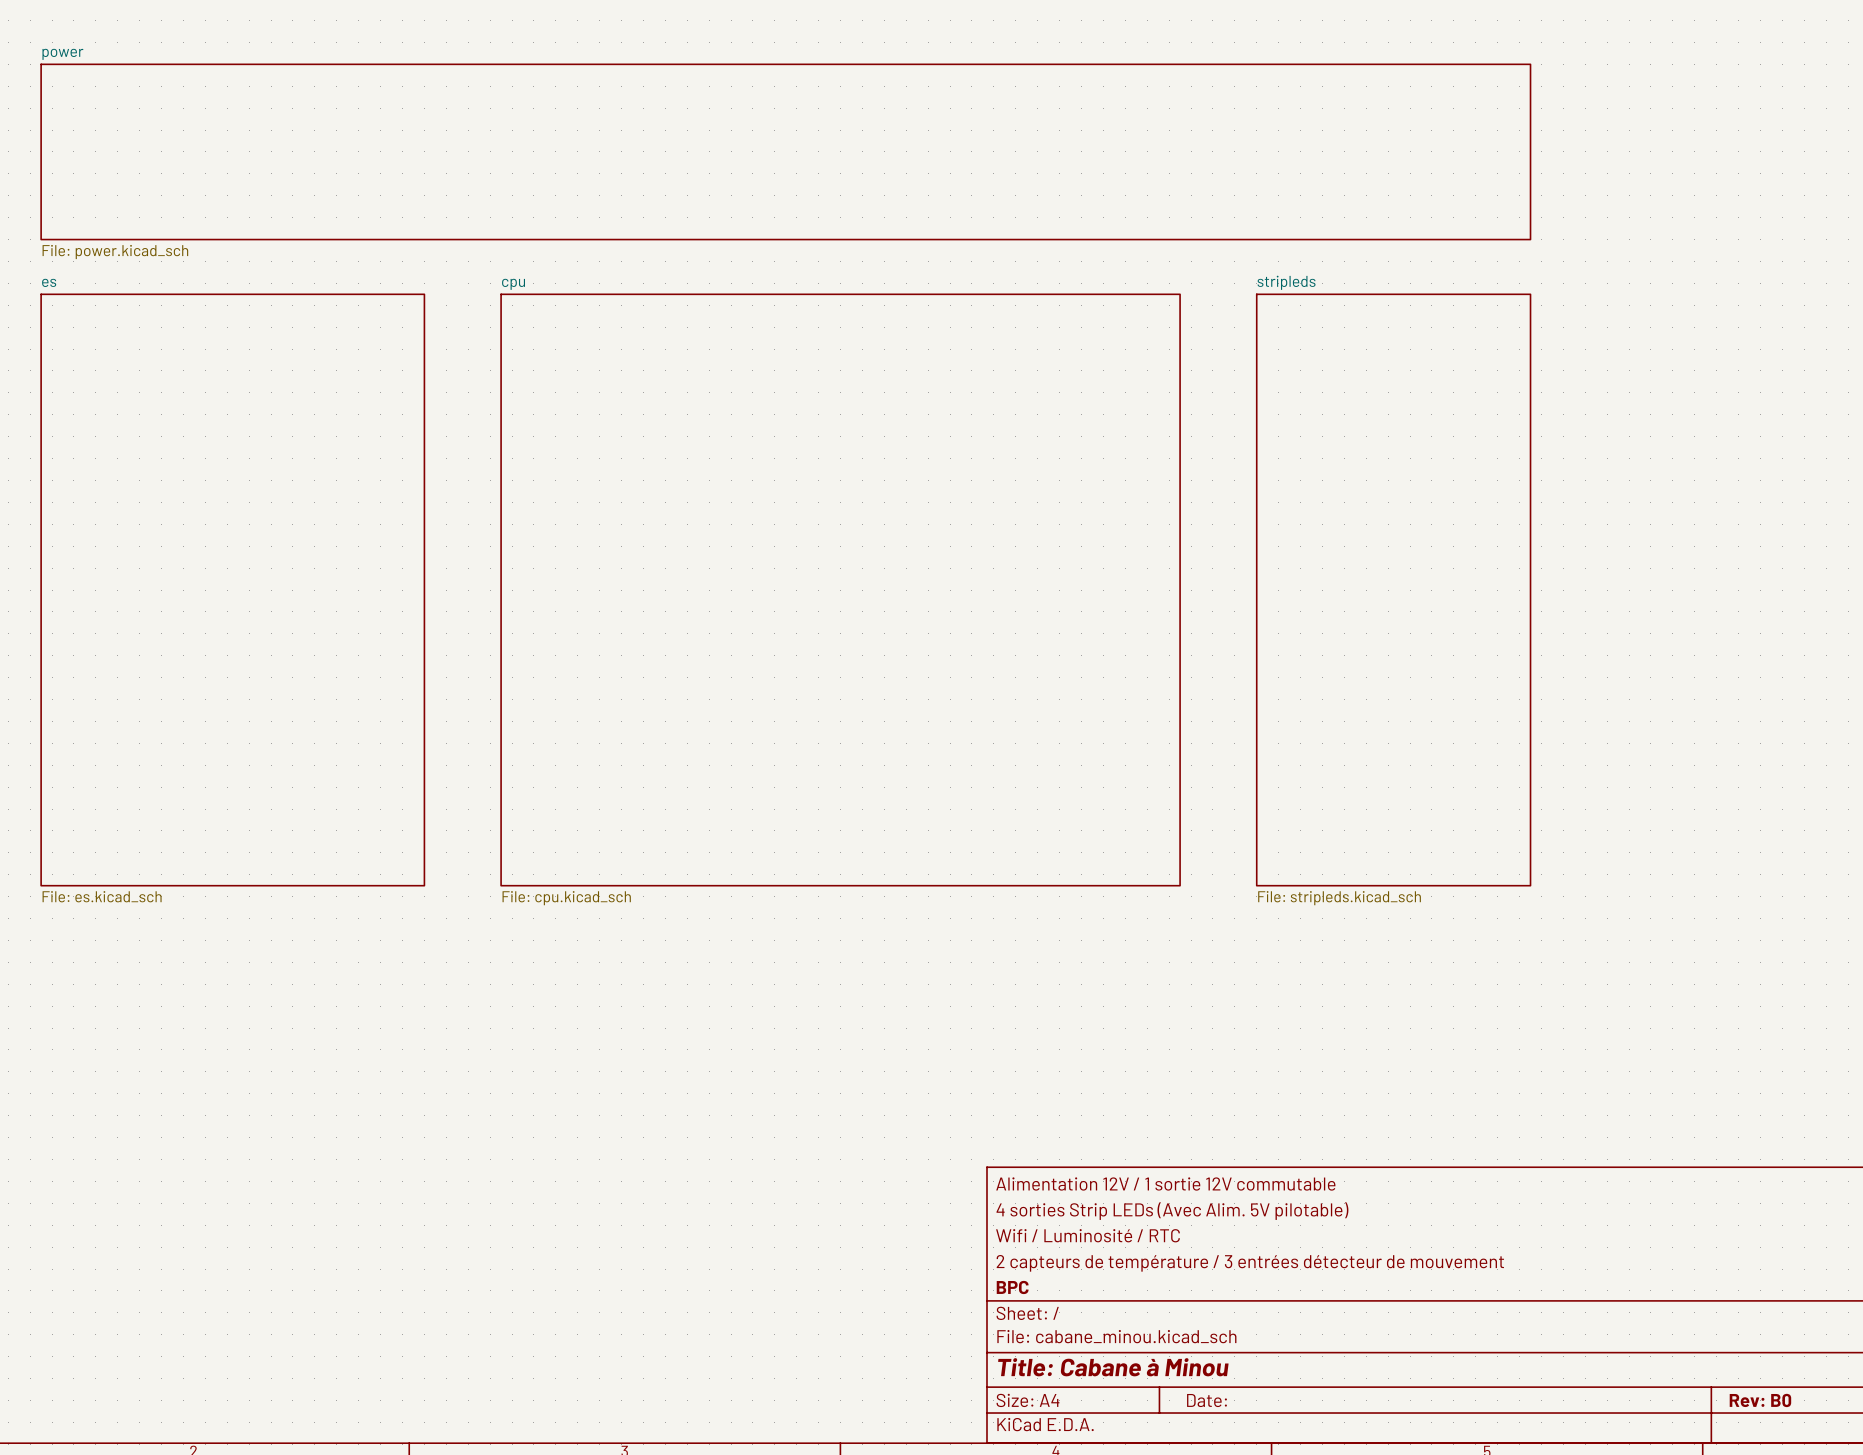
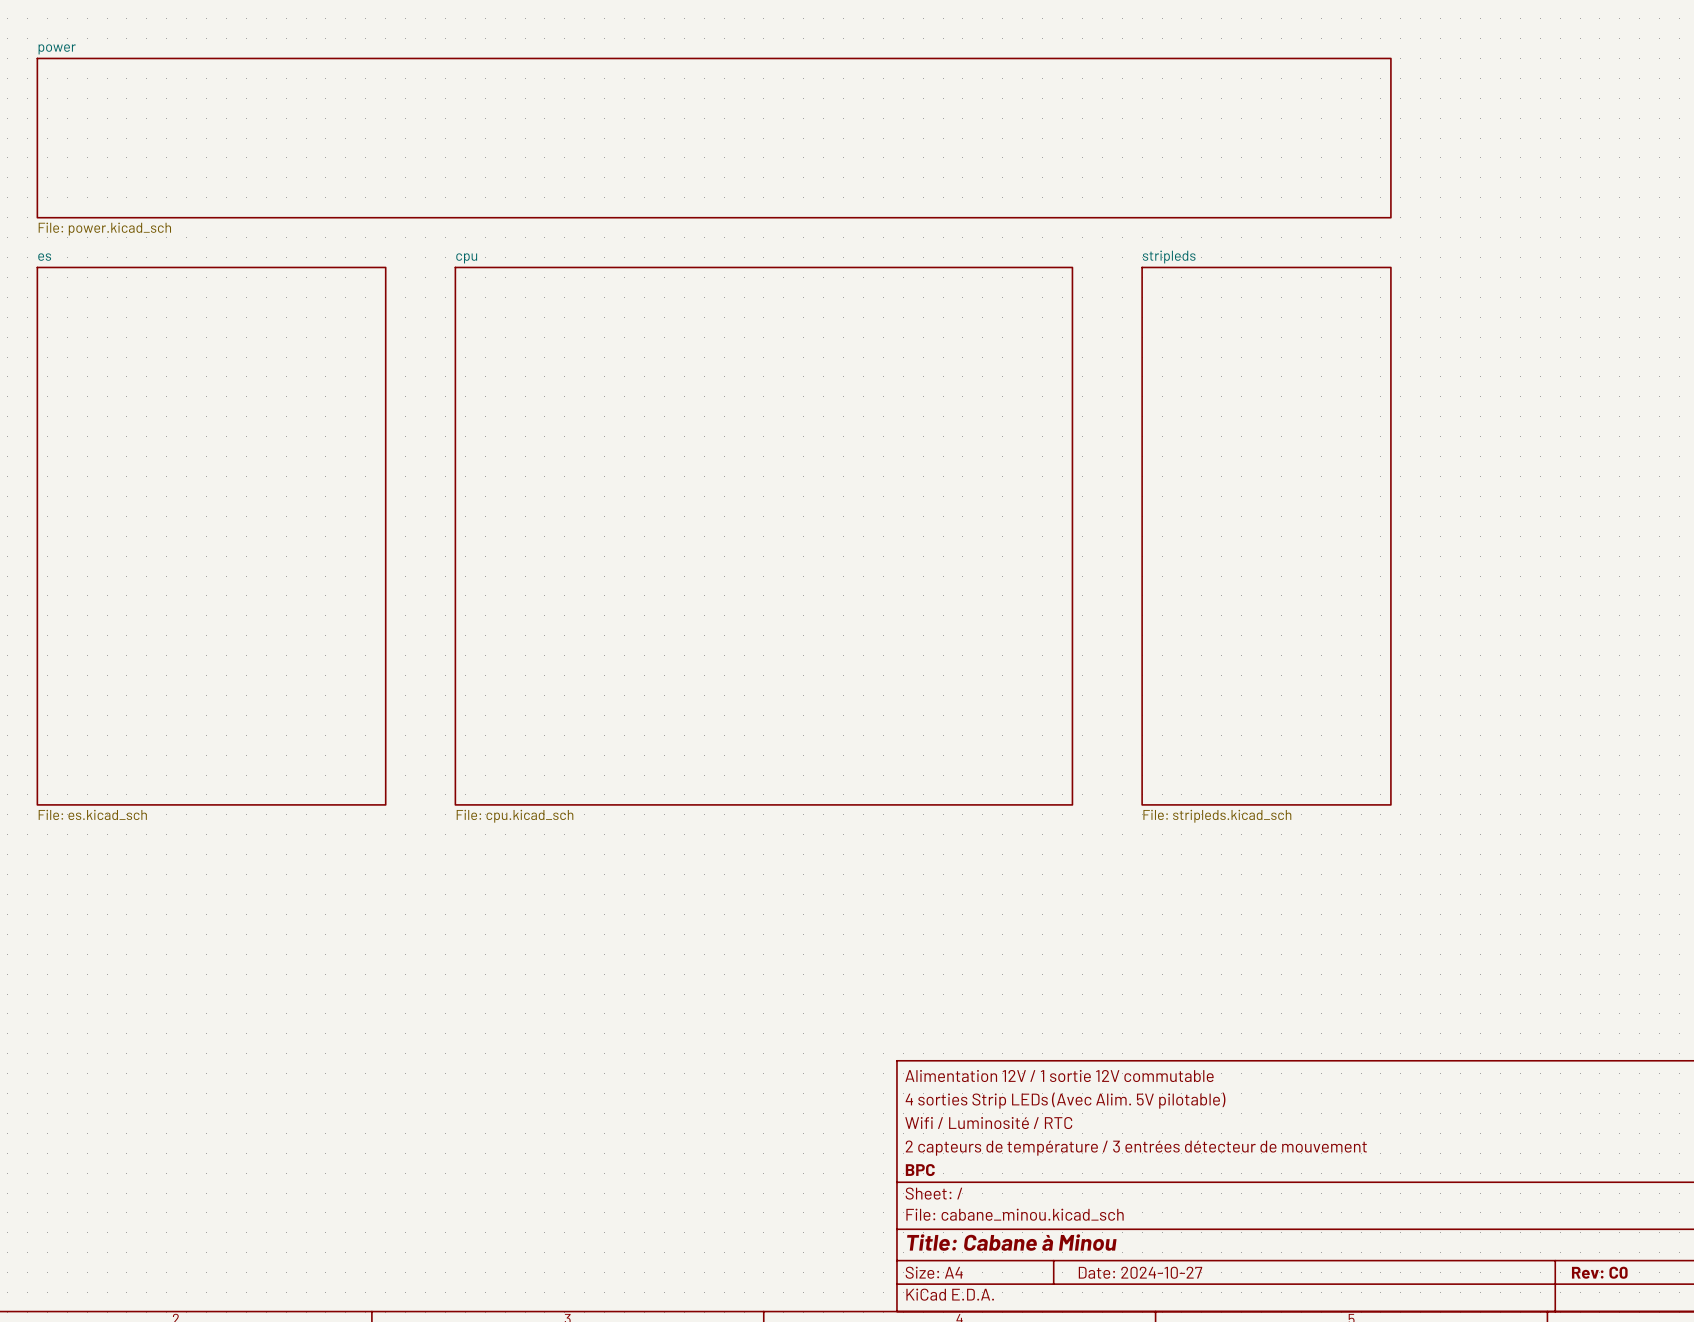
title block: Date: (1206, 1400) -> Date: 2024-10-27 (1140, 1272)
title block: Rev: B0 (1760, 1400) -> Rev: C0 (1599, 1272)

